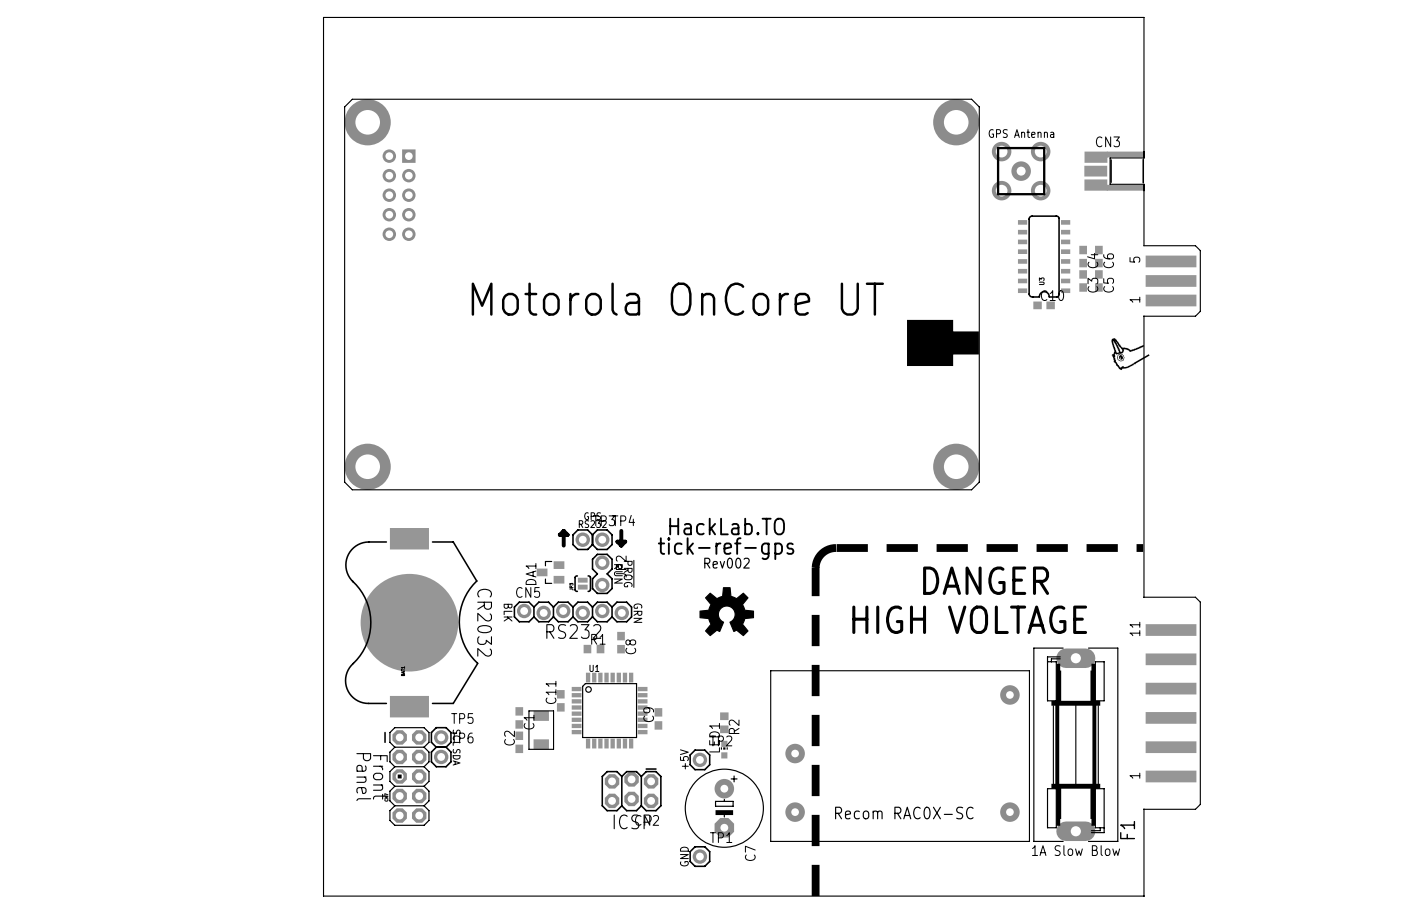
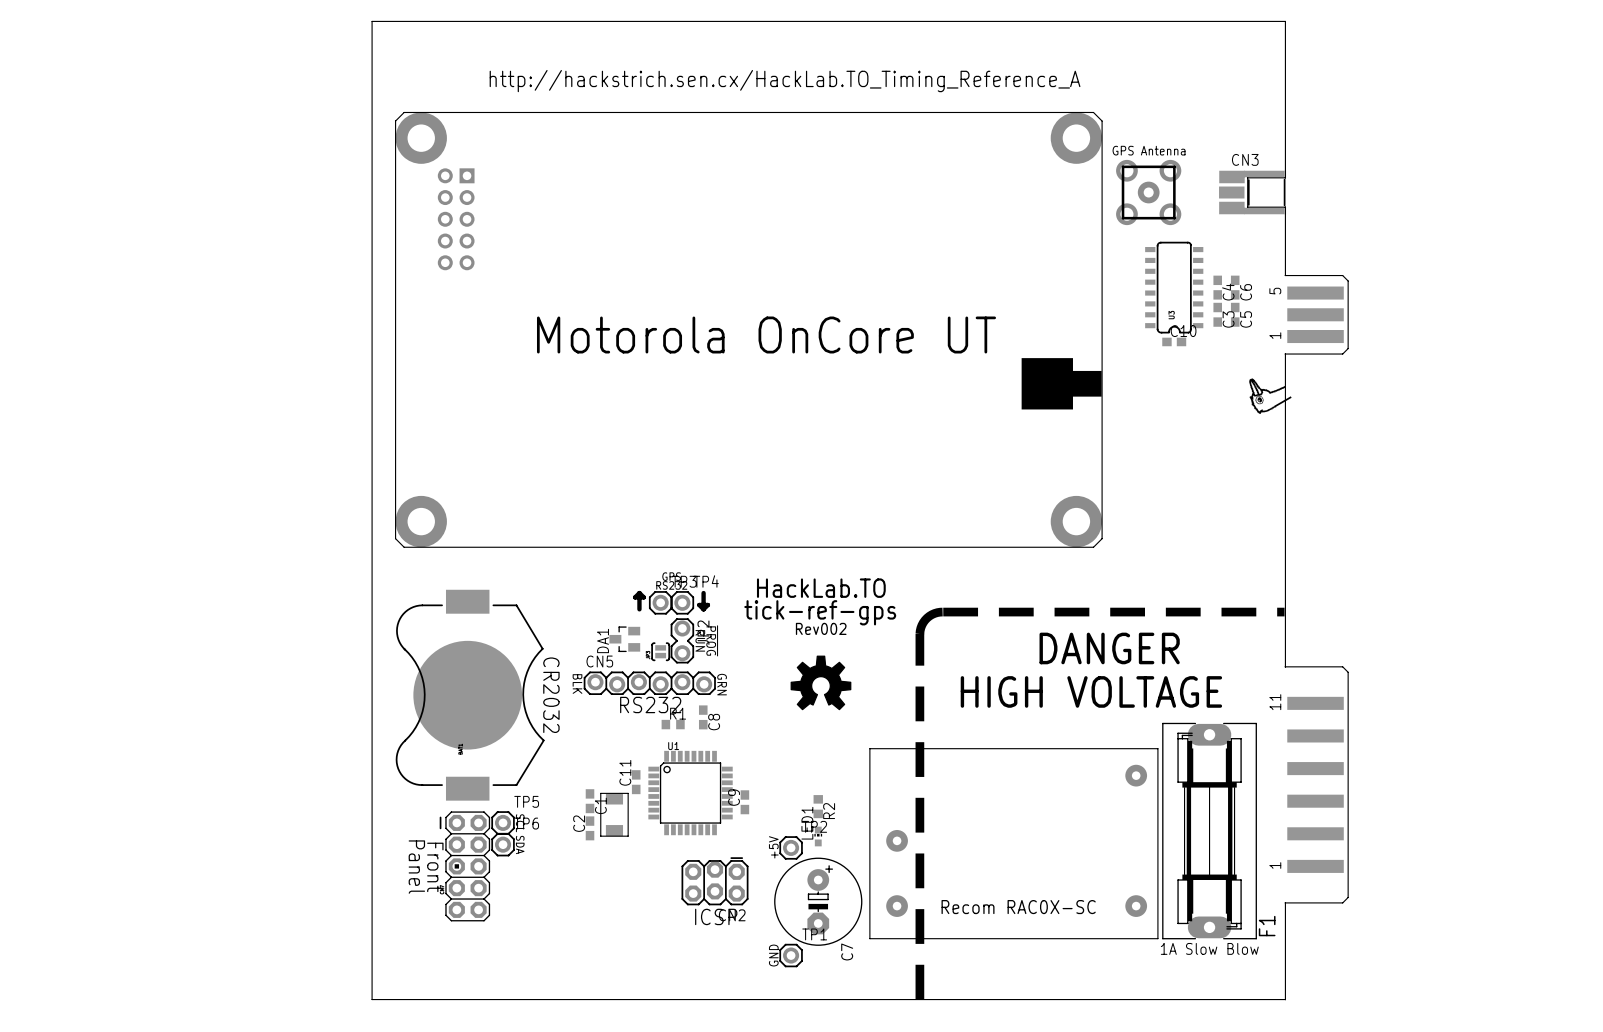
text: none -> http://hackstrich.sen.cx/HackLab.TO_Timing_Reference_A (785, 81)

